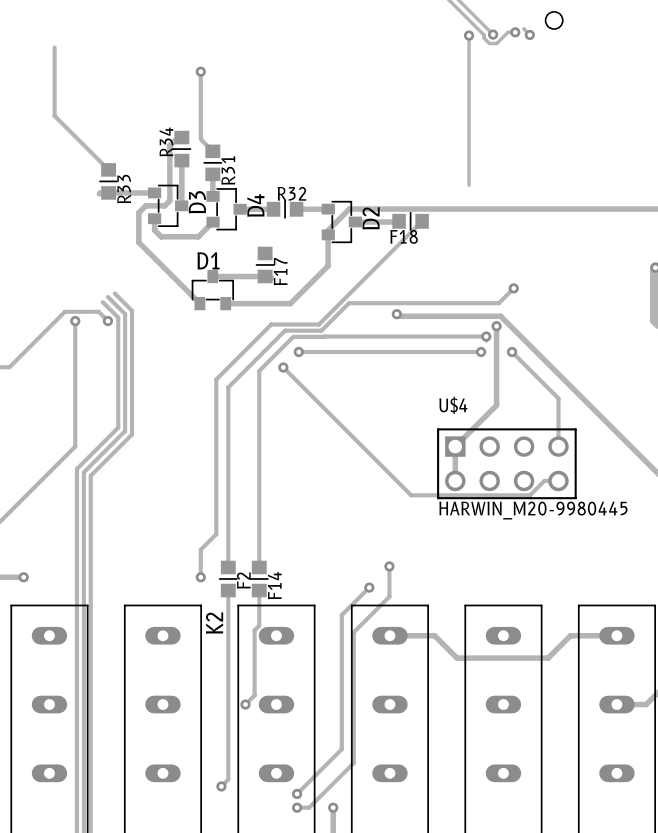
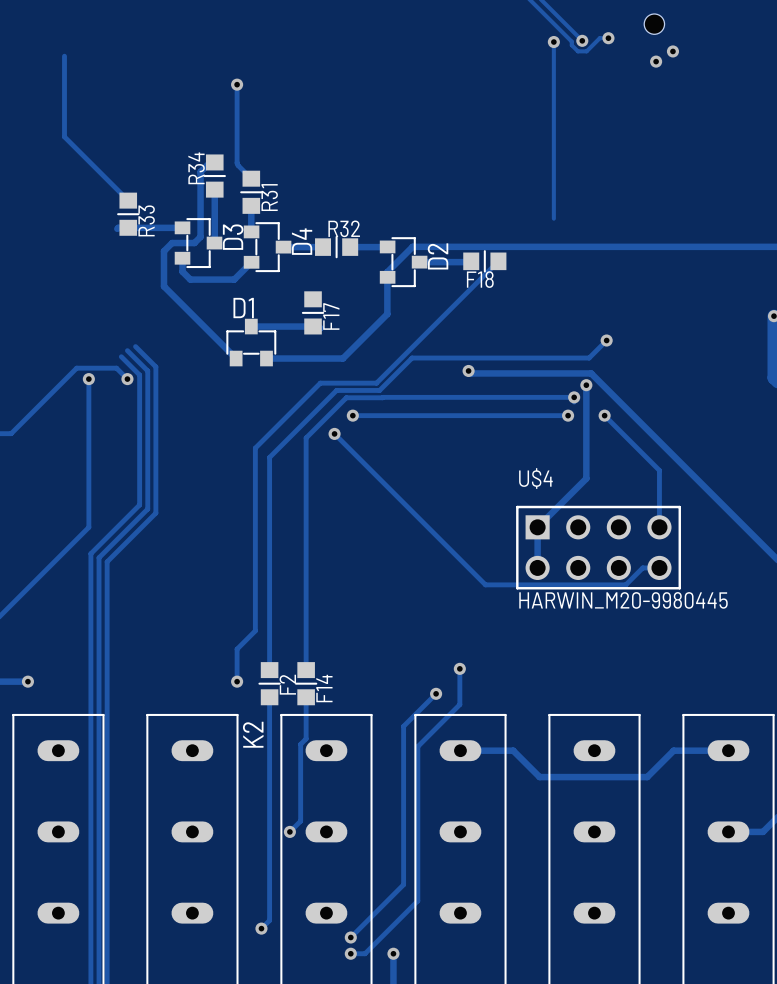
track: (524, 28) (529, 34) -> none
via: (529, 34) -> none
via: none -> (672, 51)
via: none -> (656, 61)

